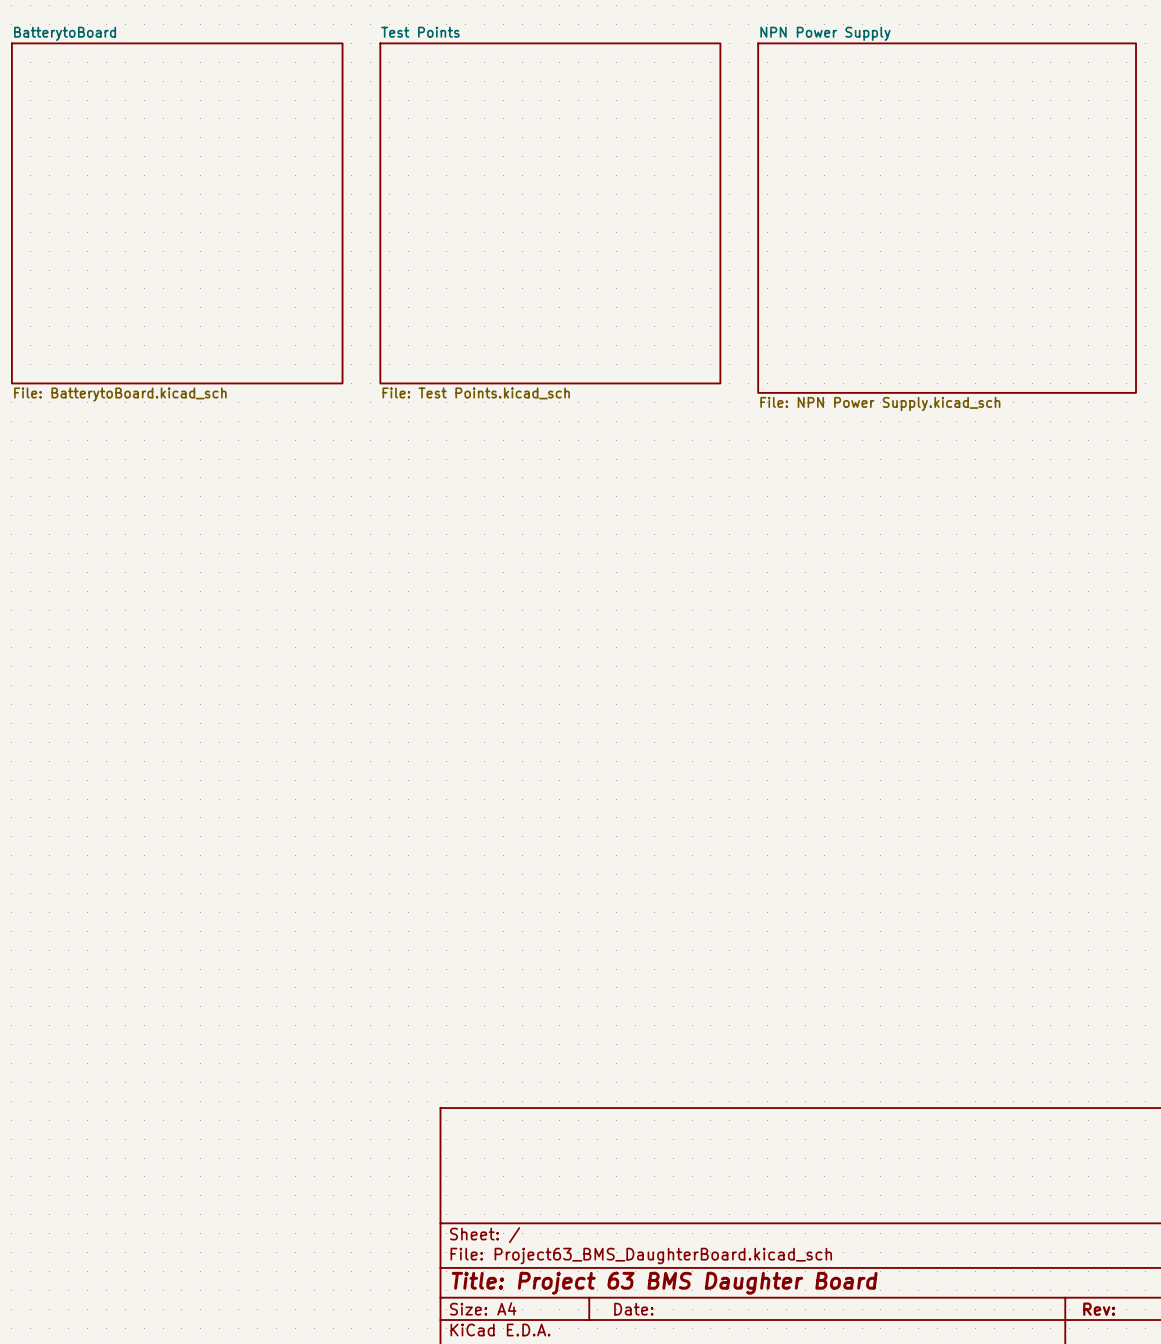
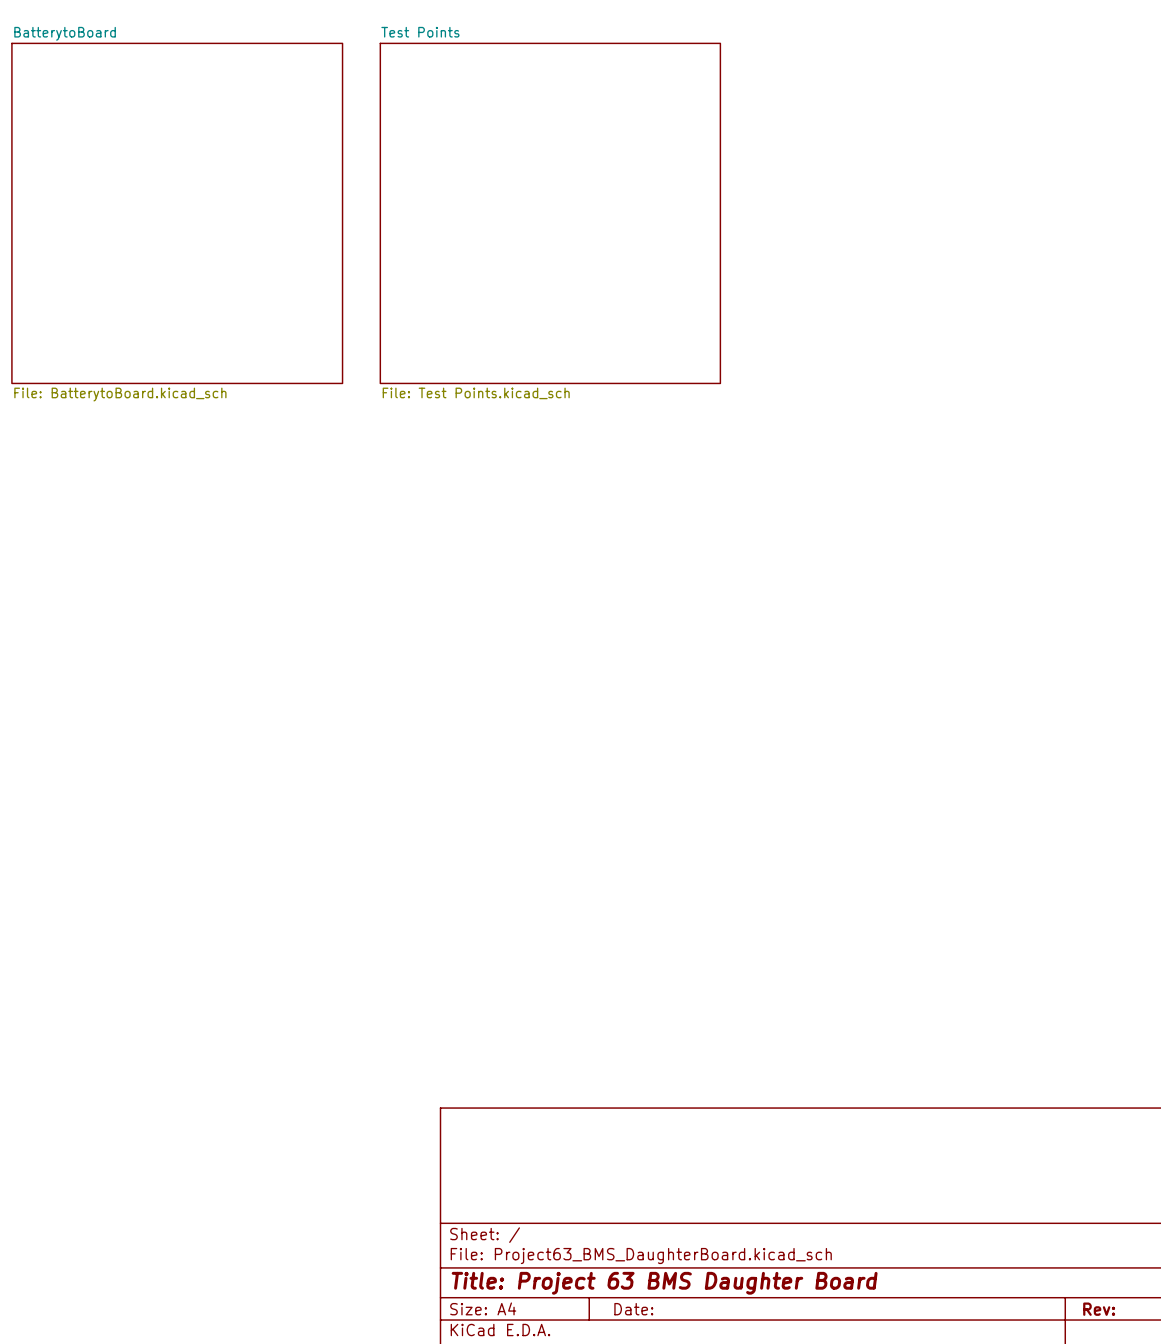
sheet NPN Power Supply: File: NPN Power Supply.kicad_sch (947, 218) -> none

